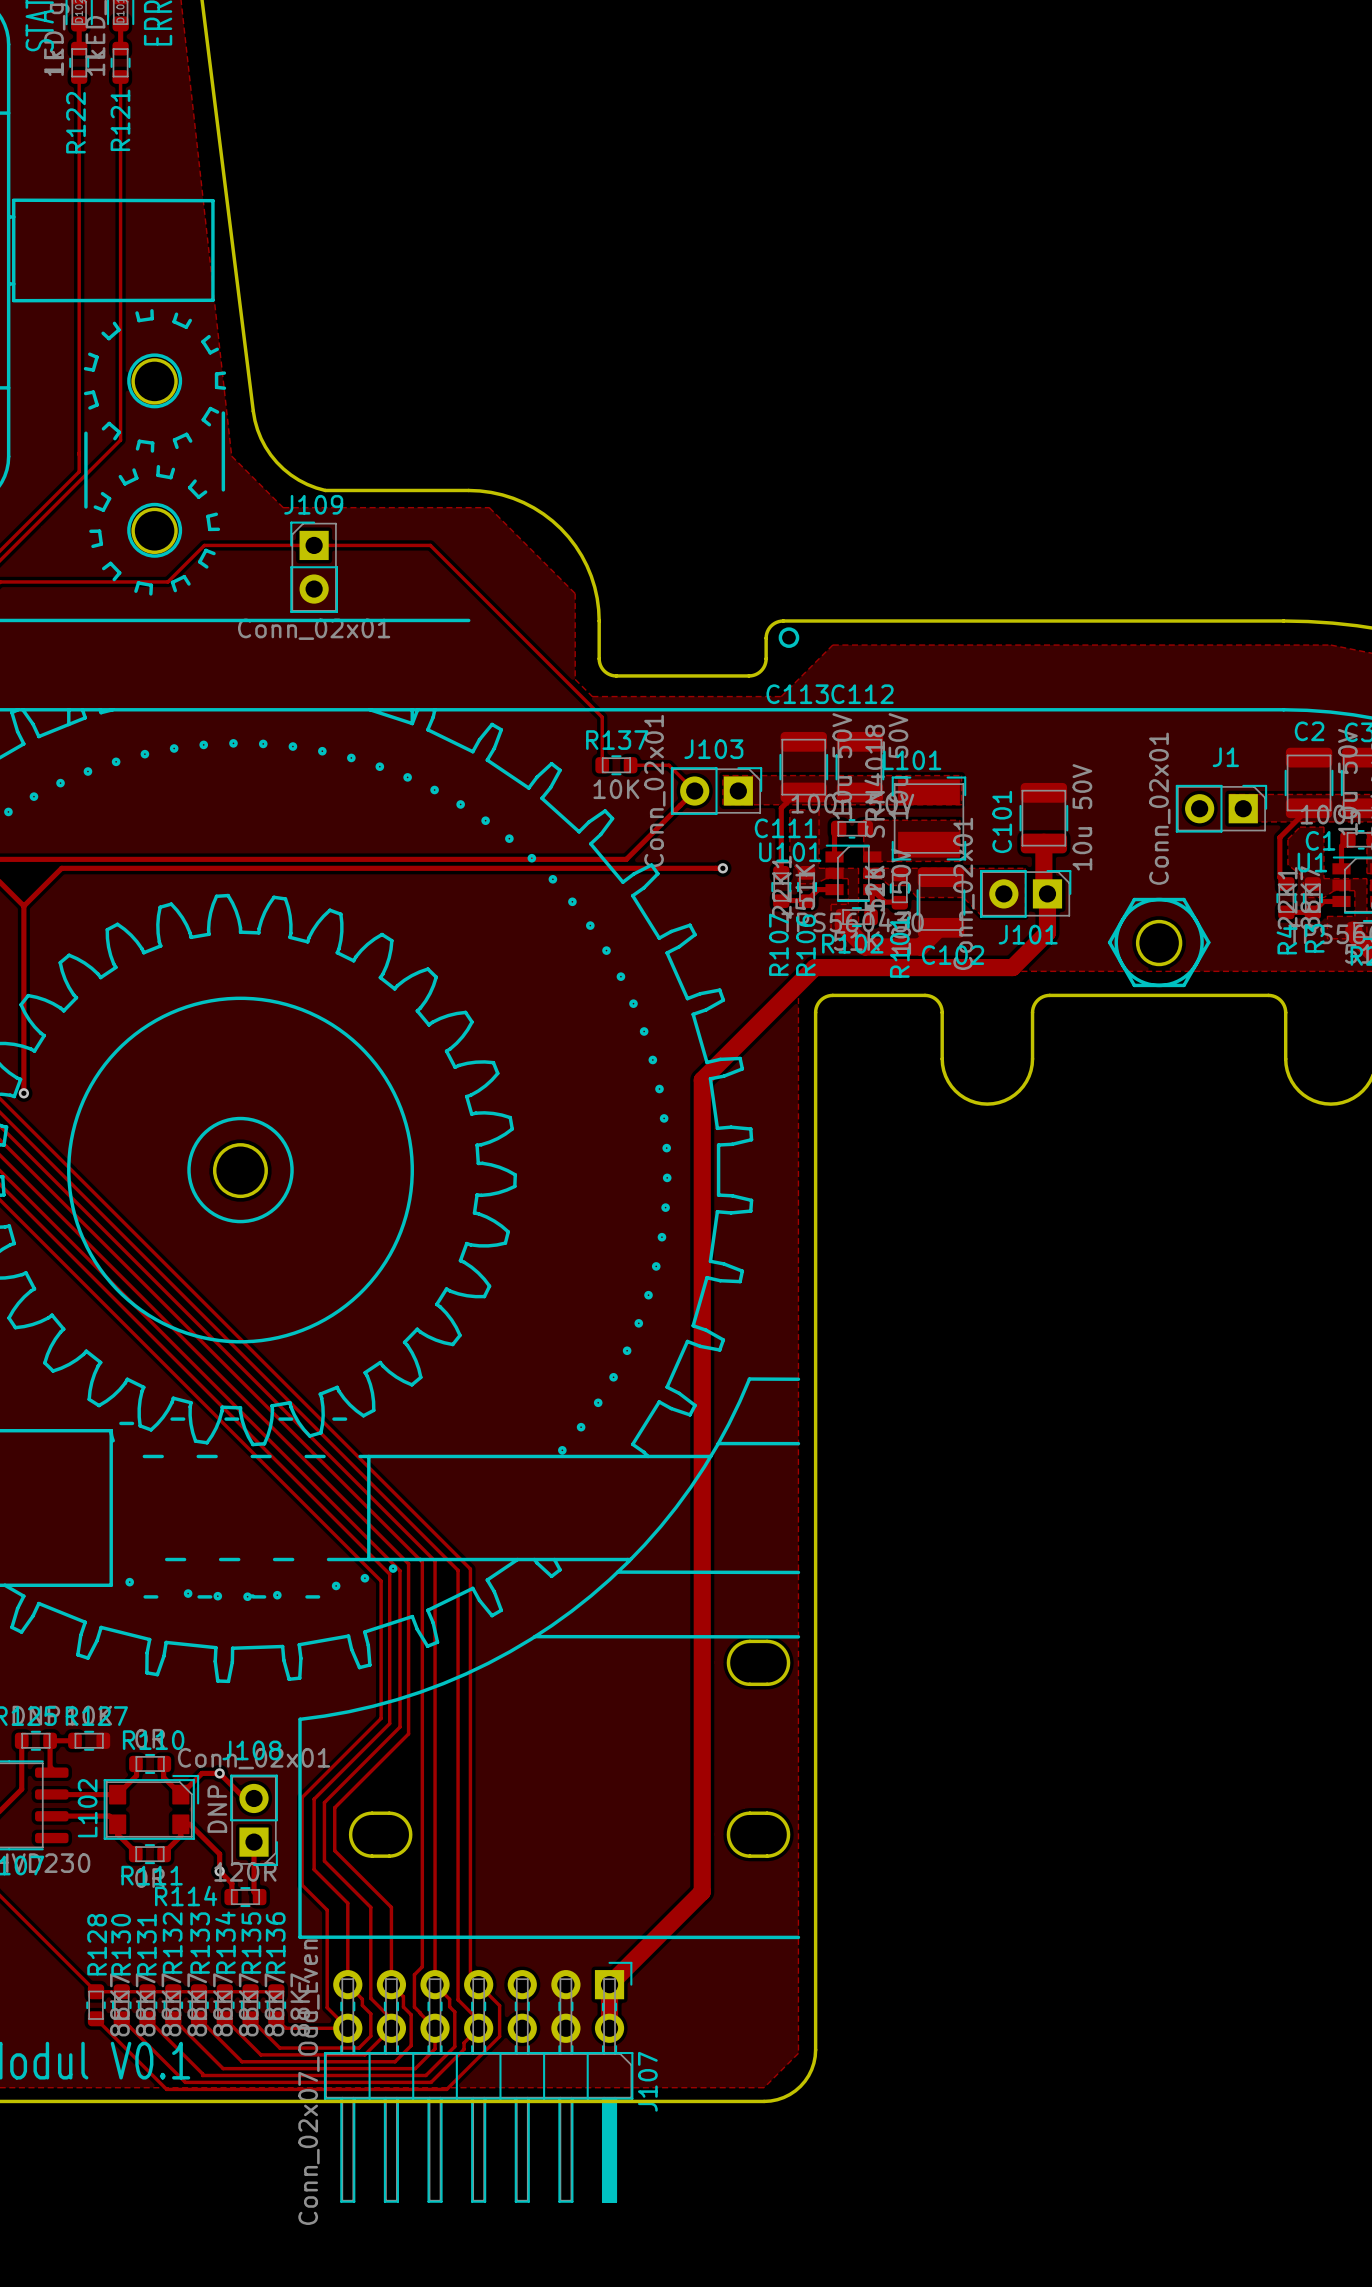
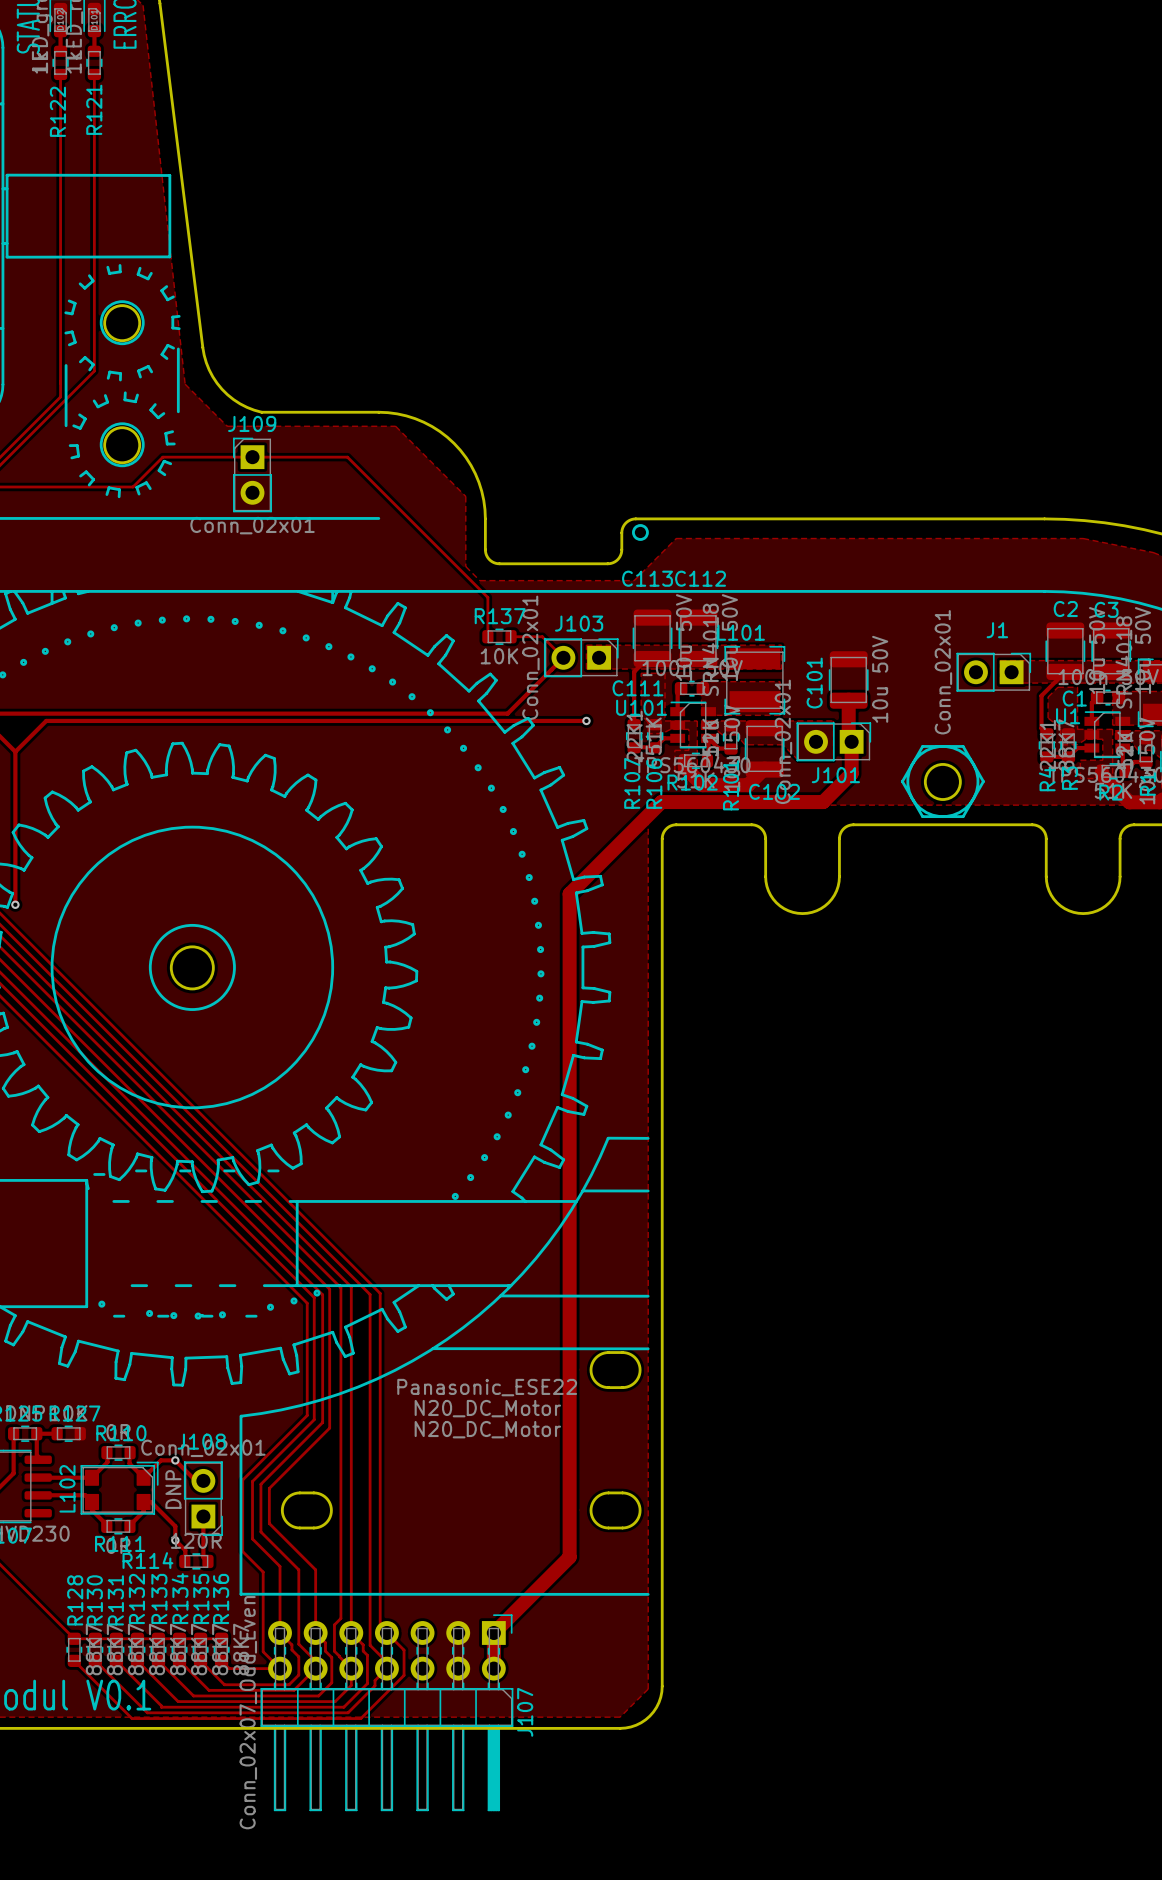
drawing: none -> [397, 1378, 578, 1439]

